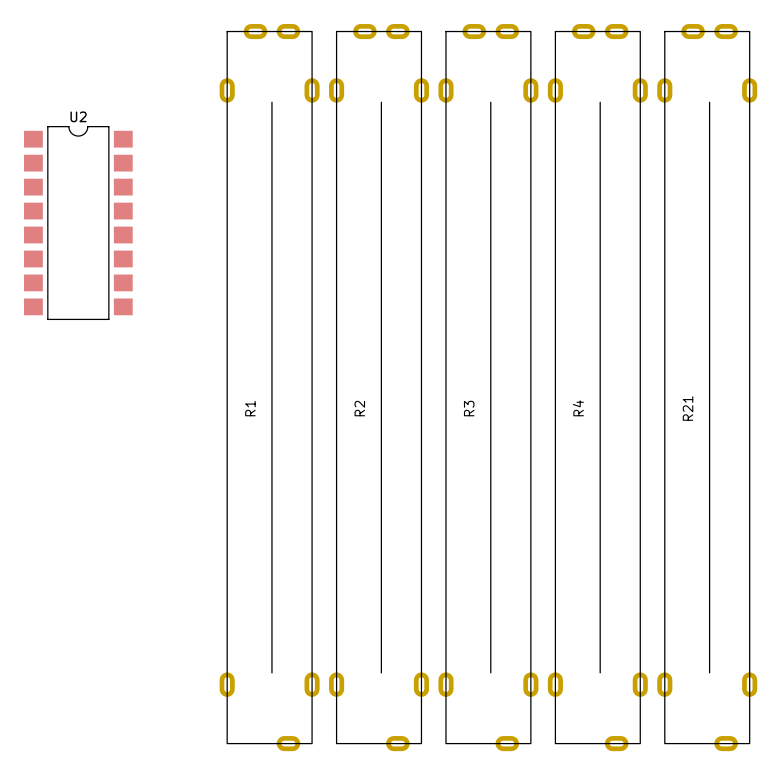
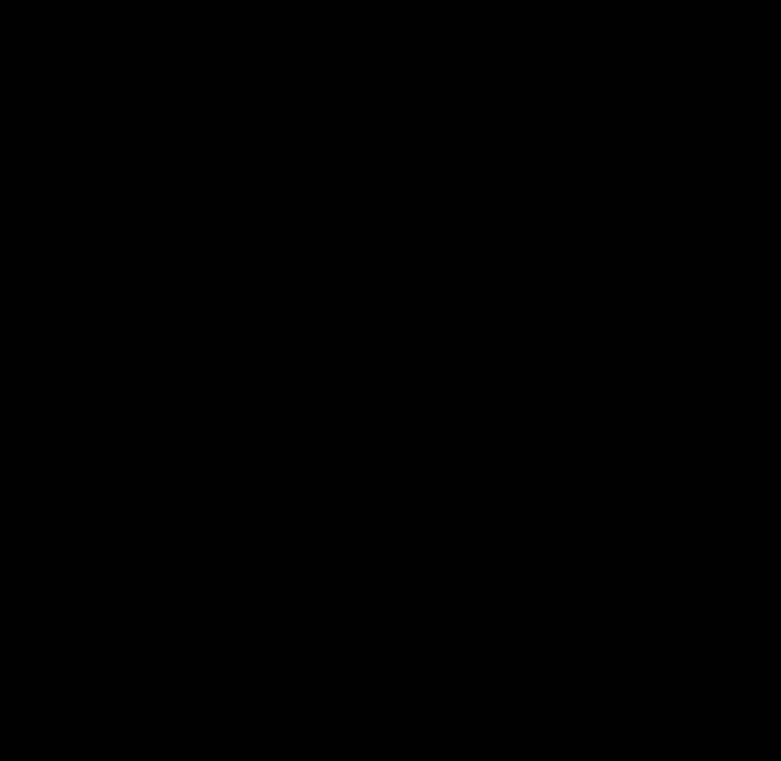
U2: (78, 223) -> none
R1: (269, 387) -> none
R2: (379, 387) -> none
R3: (488, 387) -> none
R4: (597, 387) -> none
R21: (707, 387) -> none

